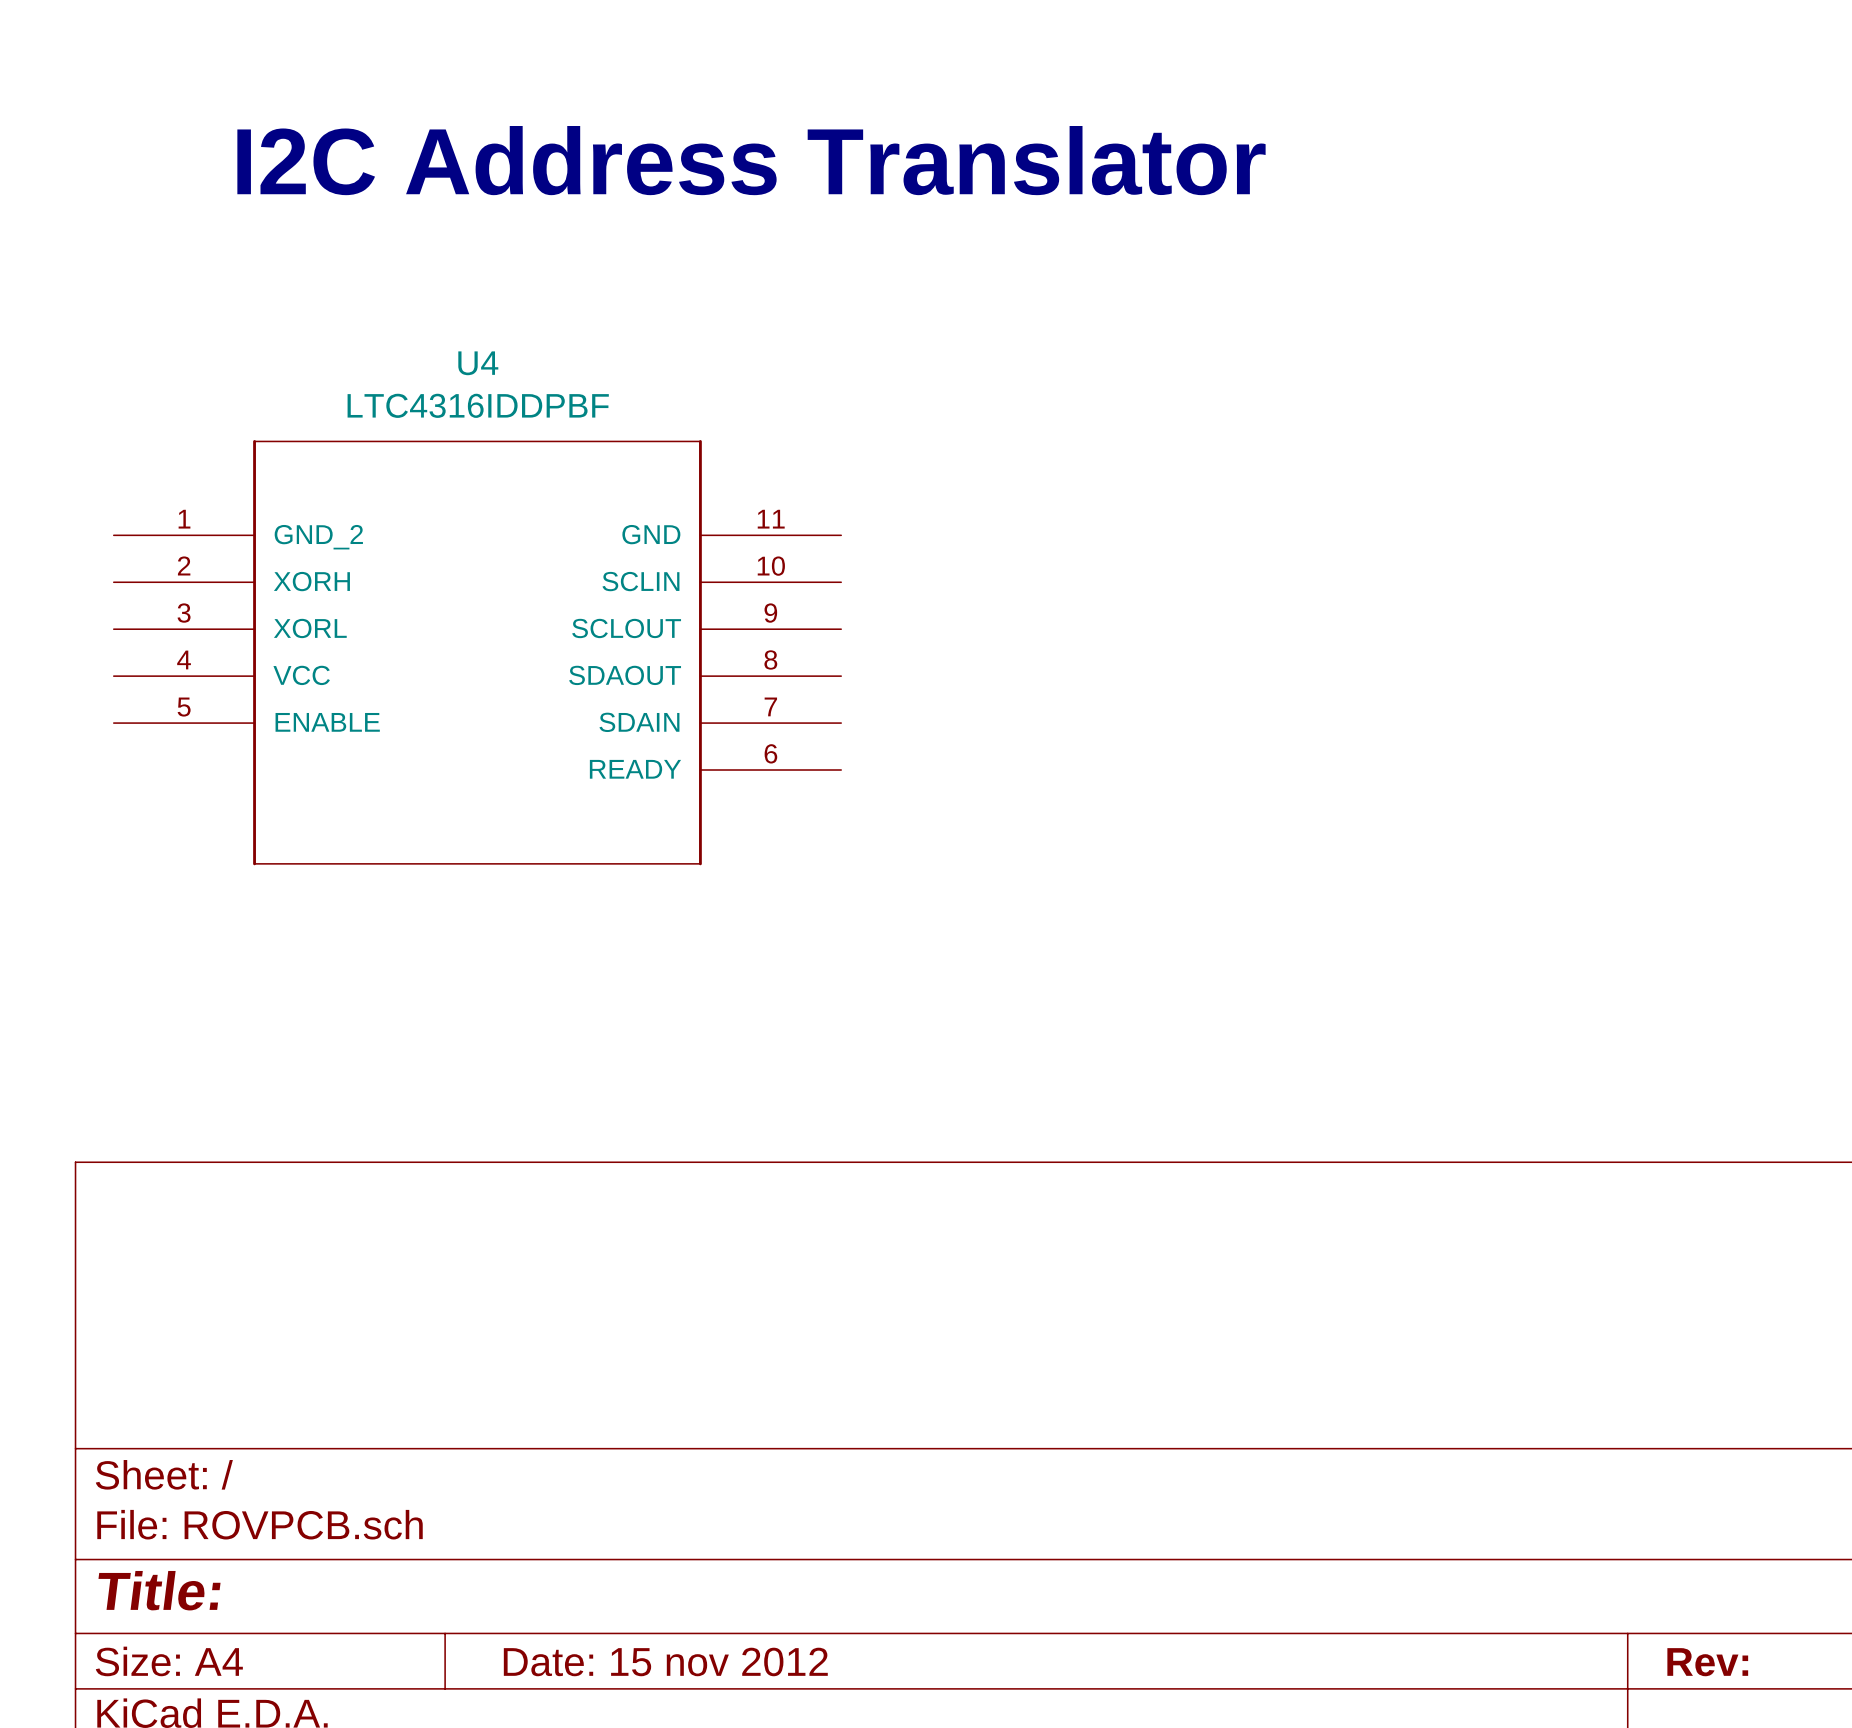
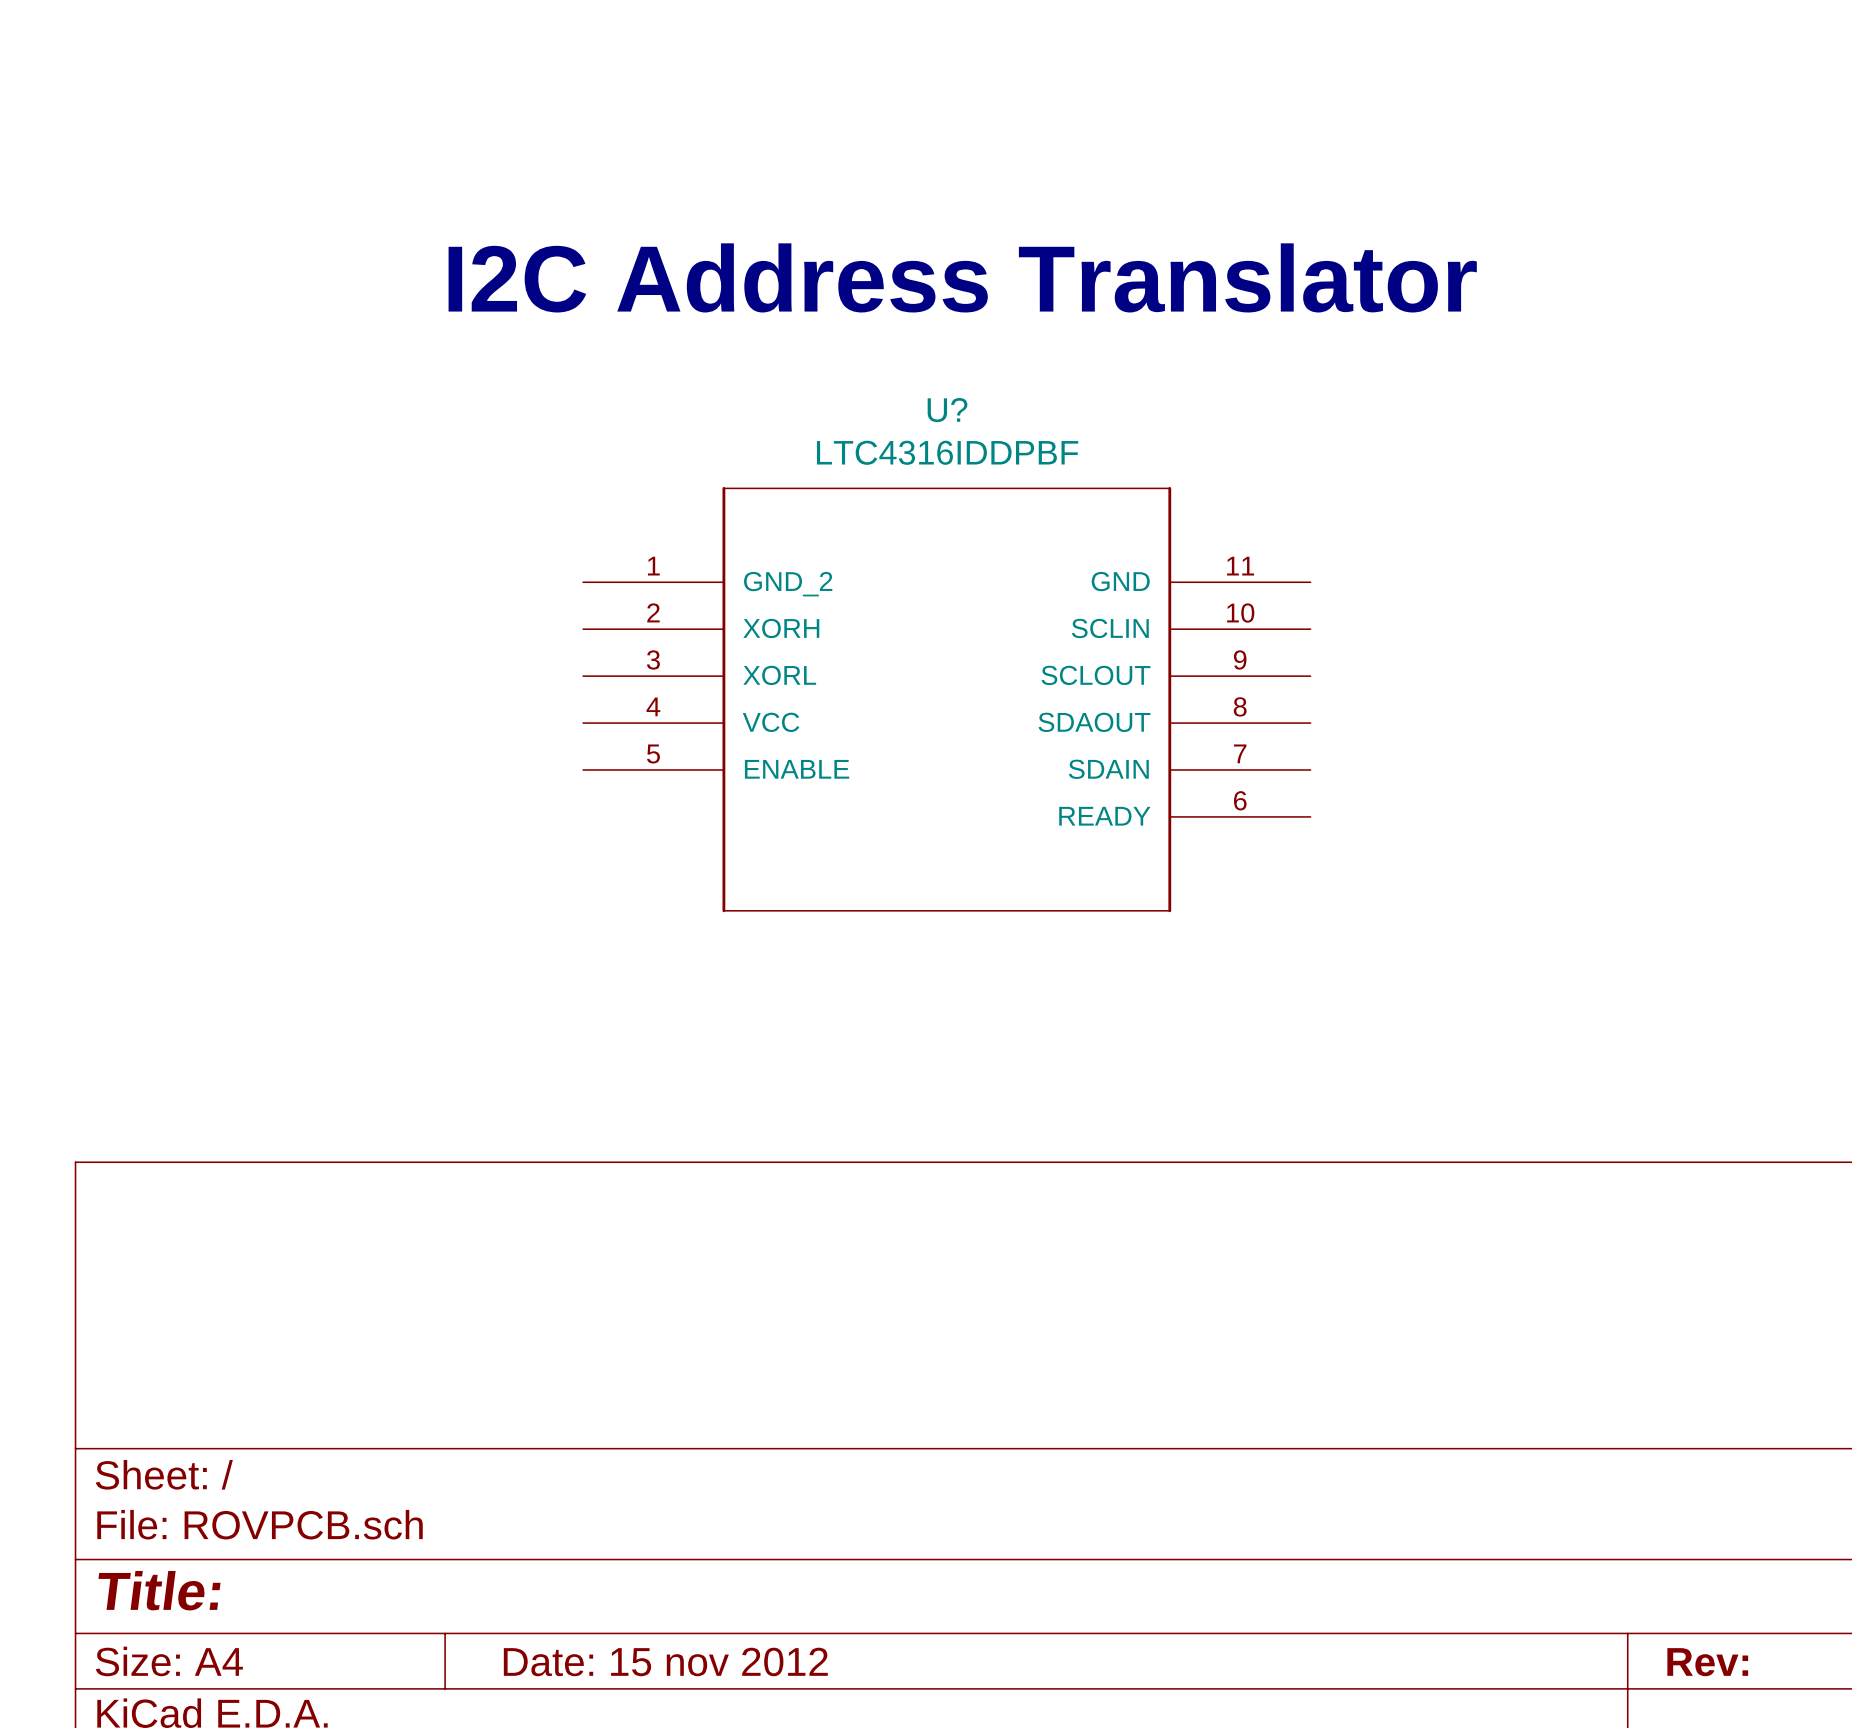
text position: I2C Address Translator (751, 160) -> I2C Address Translator (962, 277)
U4: LTC4316IDDPBF (477, 652) -> none
U?: none -> LTC4316IDDPBF (946, 699)

